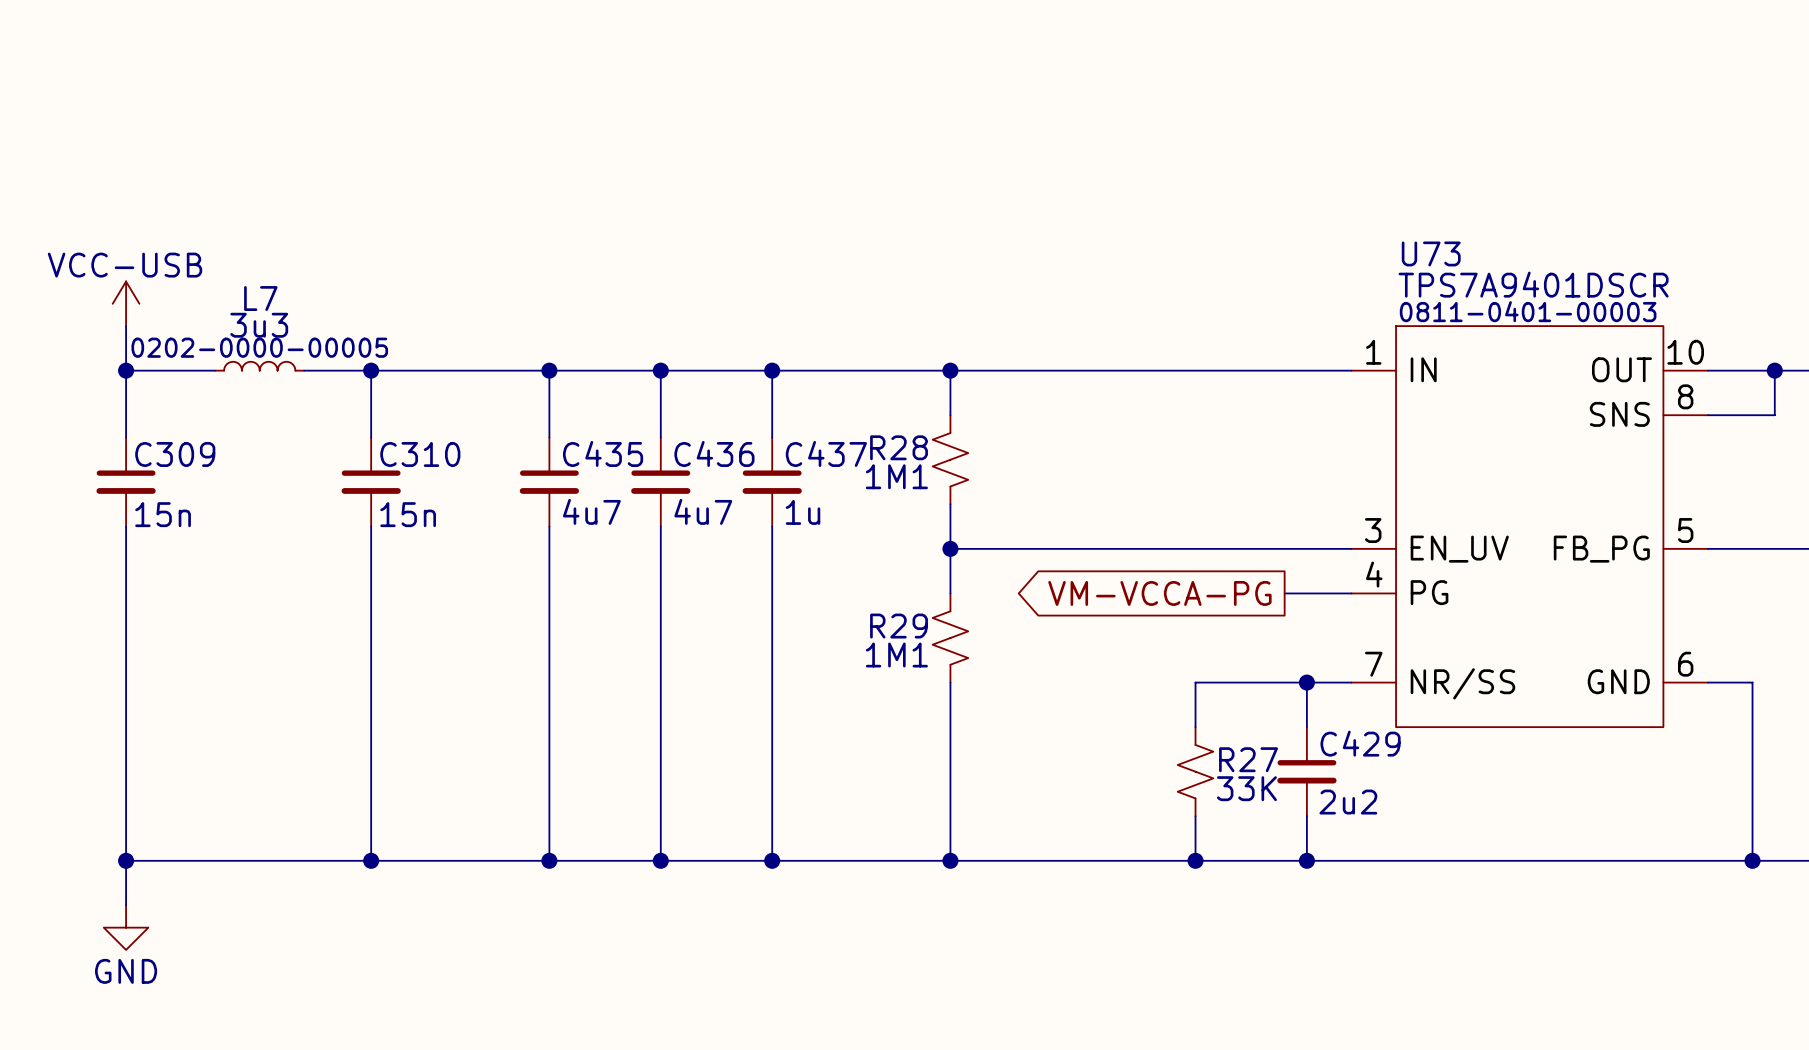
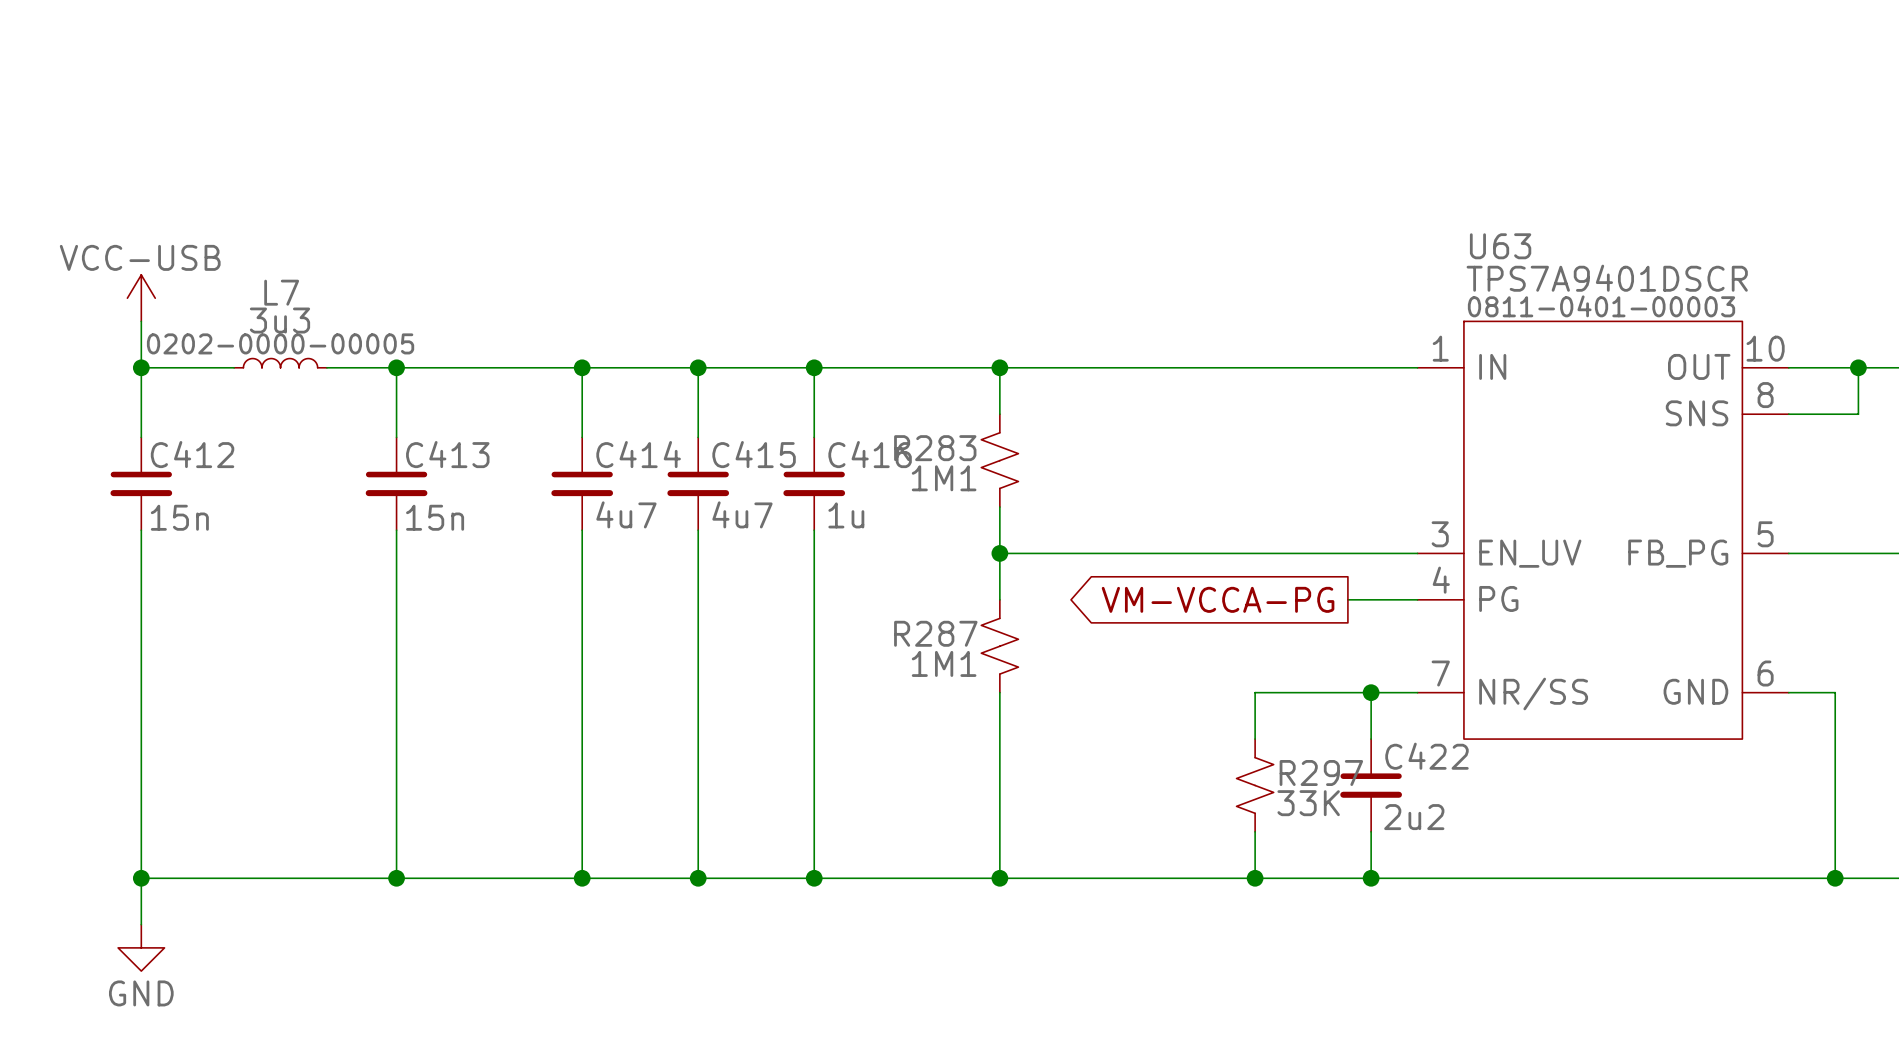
U73 name: U73 (1431, 253) -> U63 (1500, 246)
R28 name: R28 (899, 447) -> R283 (935, 448)
C435 name: C435 (603, 453) -> C414 (638, 454)
C436 name: C436 (714, 453) -> C415 (754, 454)
C437 name: C437 (826, 453) -> C416 (870, 454)
C309 name: C309 (175, 454) -> C412 (192, 454)
C310 name: C310 (420, 454) -> C413 (447, 454)
R29 name: R29 (899, 626) -> R287 (935, 633)
C429 name: C429 (1360, 743) -> C422 (1426, 756)
R27 name: R27 (1248, 759) -> R297 (1321, 773)

